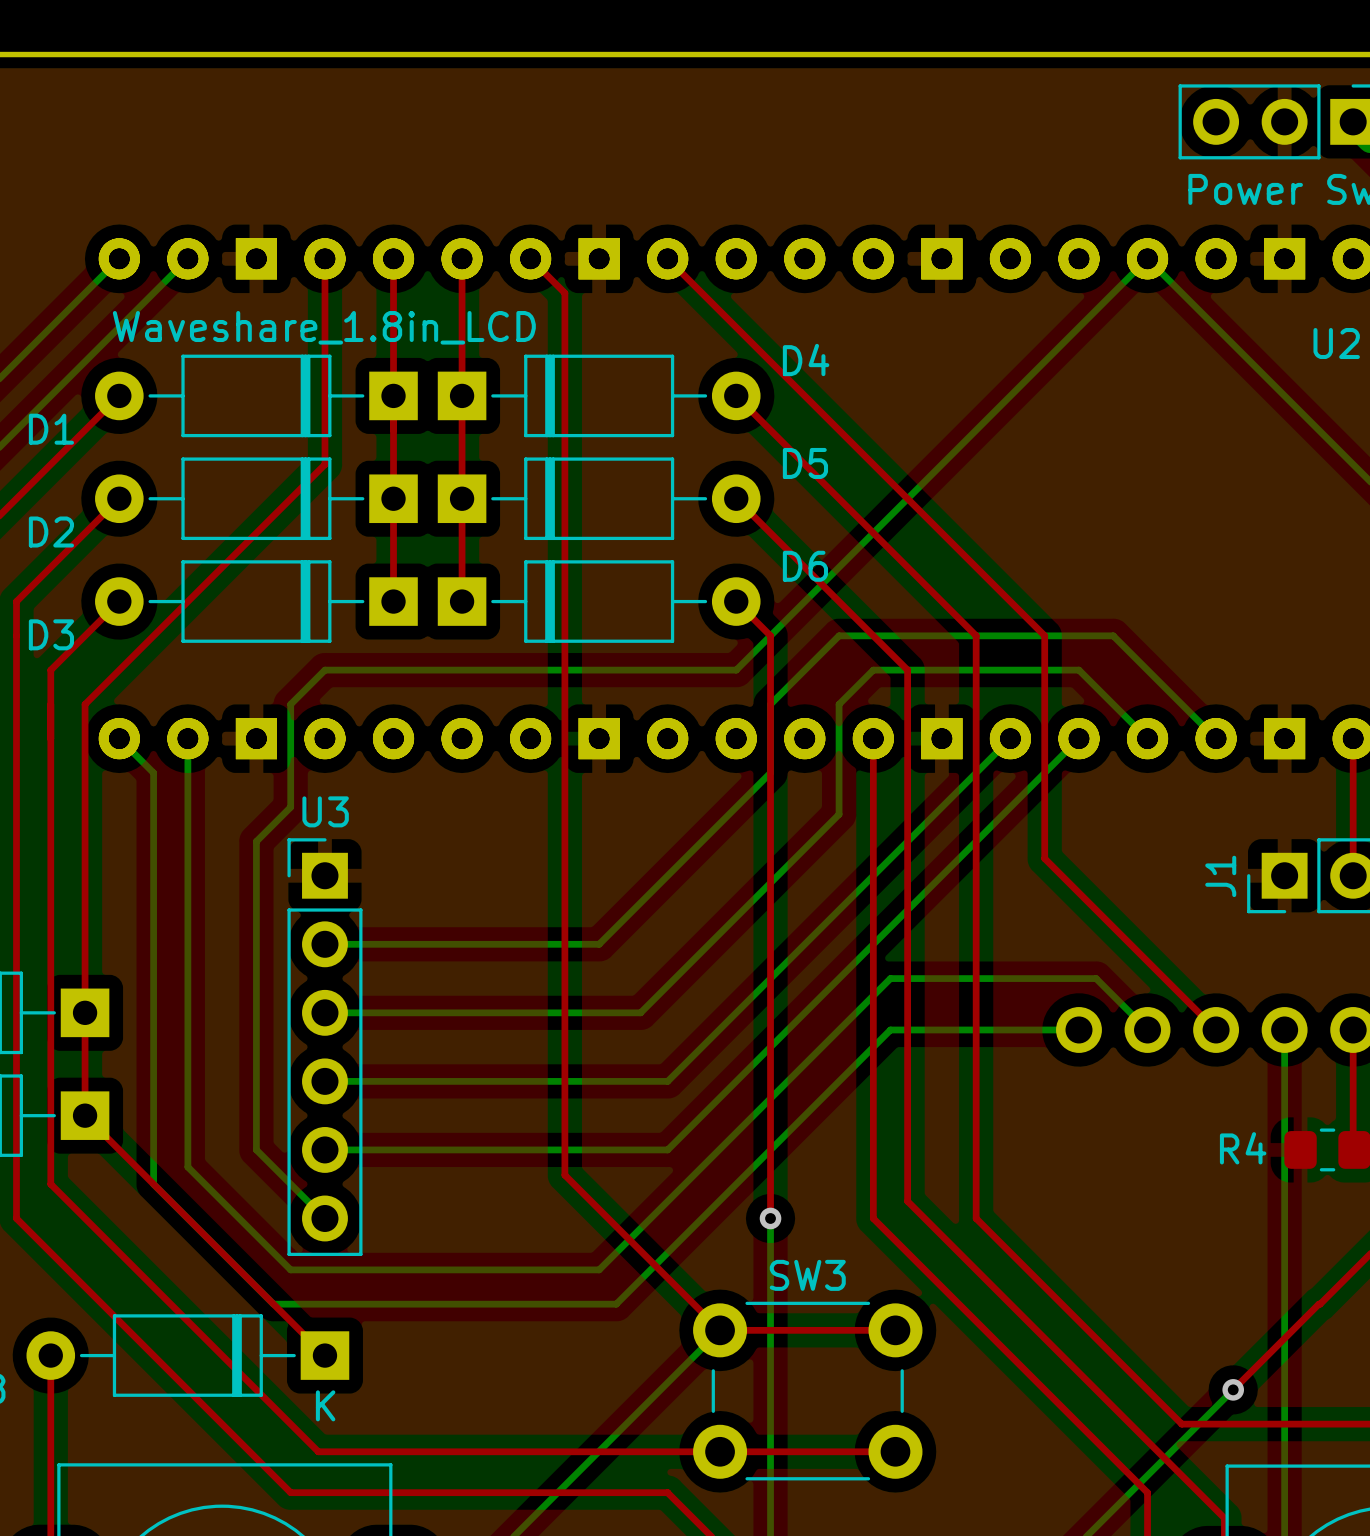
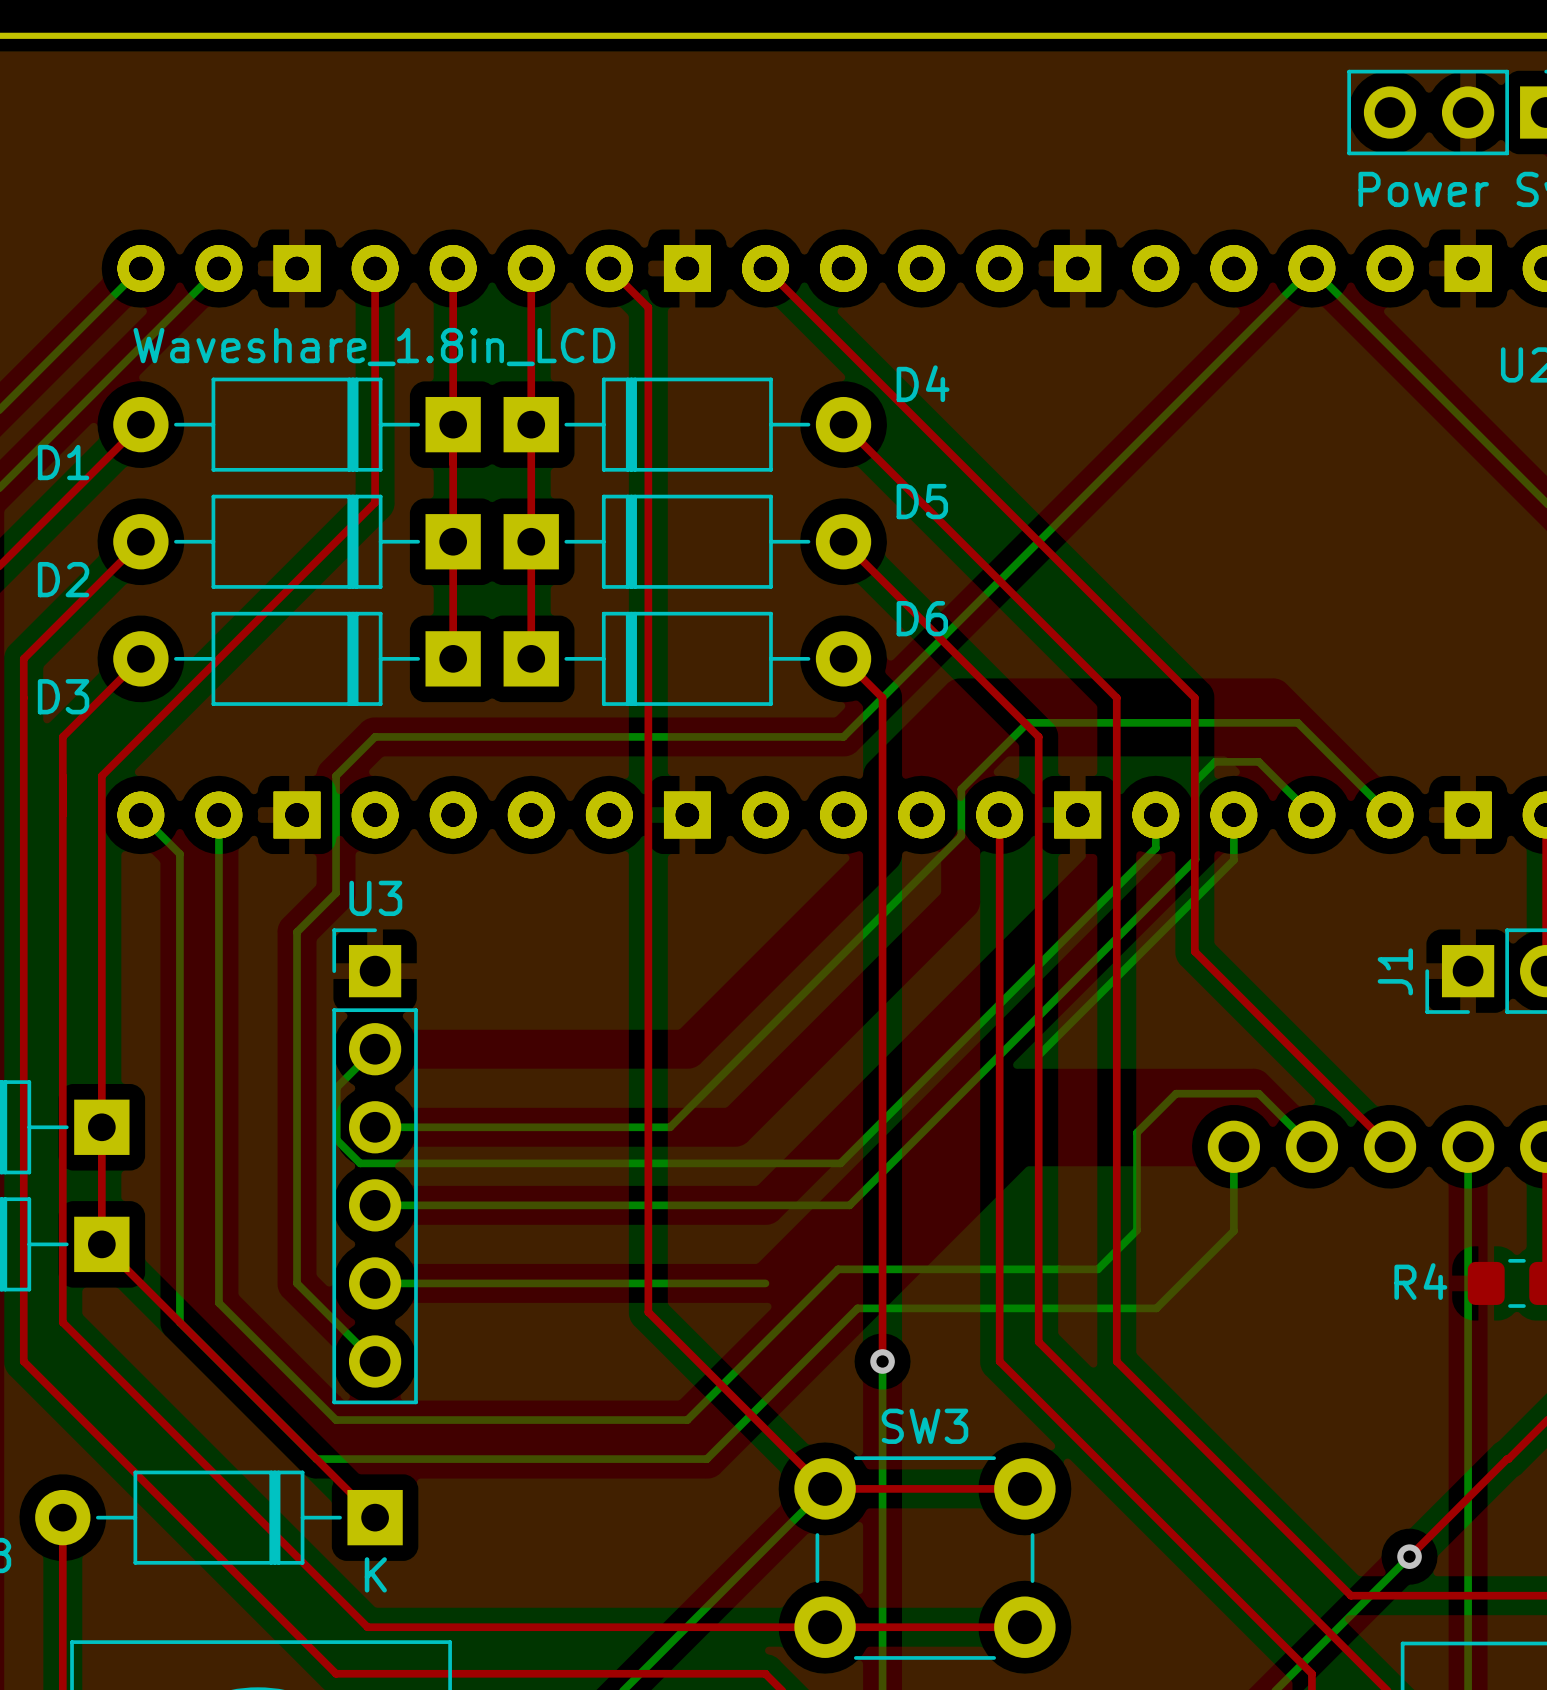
bottom track: (1135, 657) (1113, 635) (839, 635) (770, 704) (770, 772) (599, 944) (324, 944) -> (1155, 814) (1155, 848) (840, 1163) (360, 1163) (336, 1140) (336, 1087) (375, 1049)
bottom track: (1100, 692) (1078, 670) (873, 670) (839, 704) (839, 814) (640, 1012) (583, 1012) -> (1297, 722) (1027, 722) (961, 789) (961, 836) (670, 1127)
bottom track: (1010, 738) (667, 1081) -> (1258, 761) (1215, 761) (1195, 781) (1195, 859) (849, 1205) (765, 1205)
bottom track: (1078, 738) (667, 1149) -> (1233, 814) (1233, 860) (1039, 1054)
bottom track: (1100, 983) (1096, 978) (890, 978) (731, 1137) -> (1258, 1093) (1176, 1093) (1137, 1132) (1137, 1230) (1097, 1269) (838, 1269)
bottom track: (1078, 1029) (890, 1029) (748, 1171) -> (1233, 1146) (1233, 1231) (1156, 1308) (857, 1308)

